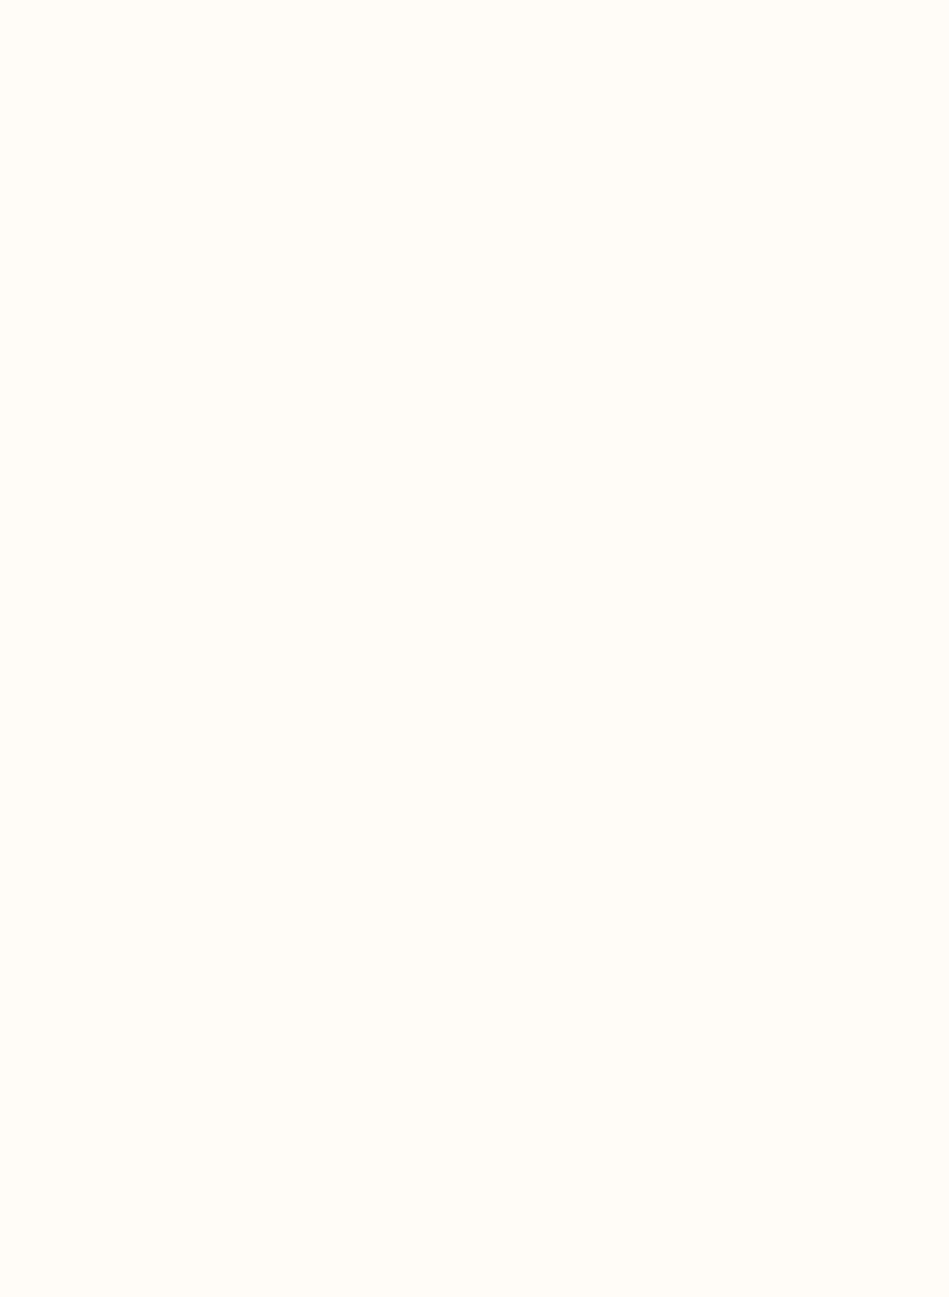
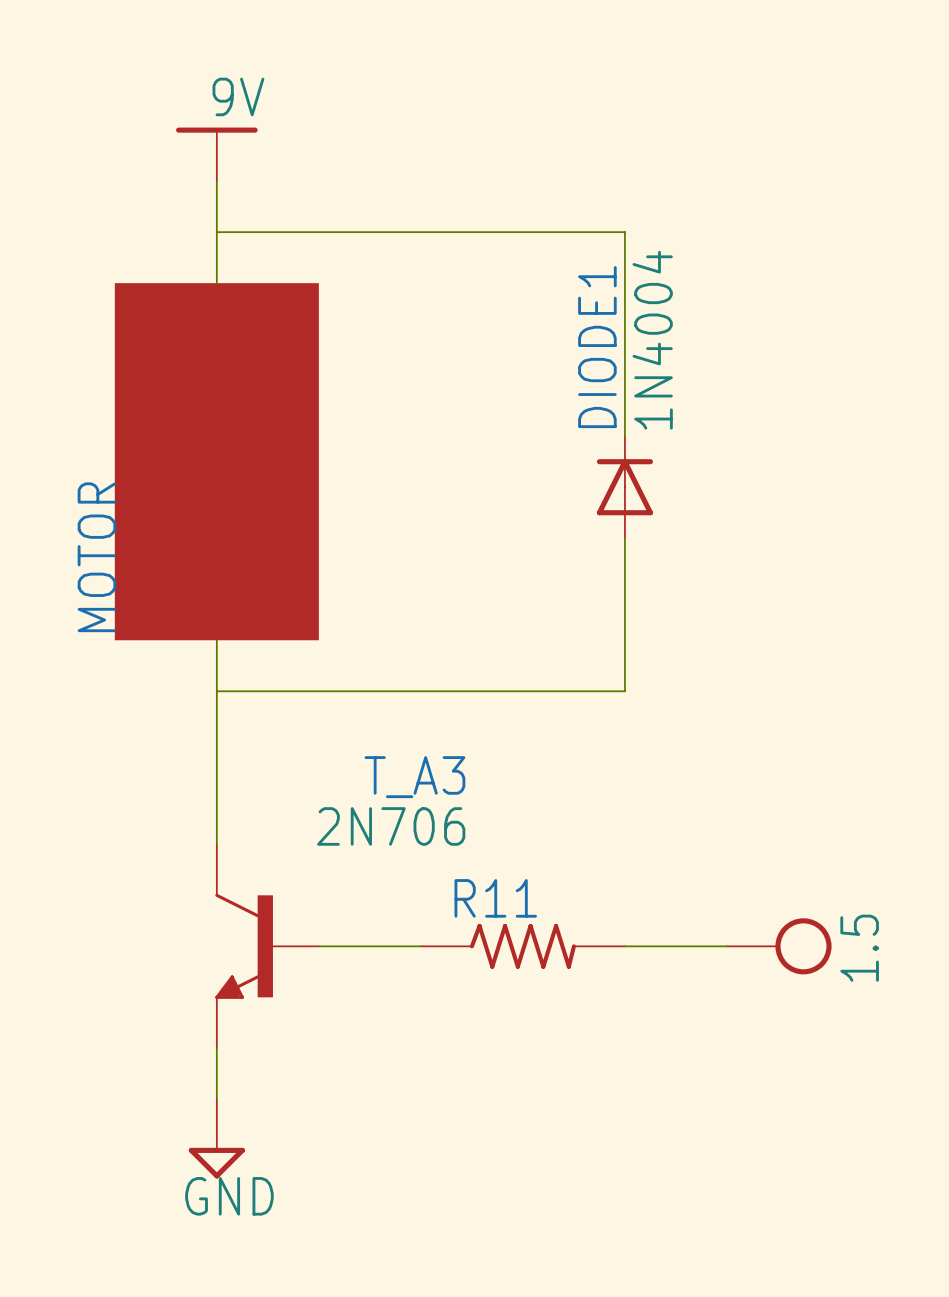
power symbol: none -> 9V (216, 154)
wire: none -> (216, 181) (216, 283)
wire: none -> (216, 232) (624, 232) (624, 436)
drawing: none -> [114, 283, 319, 641]
DIODE1: none -> 1N4004 (624, 487)
wire: none -> (624, 538) (624, 691) (216, 691)
text: none -> MOTOR (96, 557)
wire: none -> (216, 640) (216, 844)
T_A3: none -> 2N706 (267, 946)
wire: none -> (318, 946) (420, 946)
R11: none -> (522, 946)
wire: none -> (624, 946) (726, 946)
power symbol: none -> 1.5 (779, 946)
wire: none -> (216, 1048) (216, 1099)
power symbol: none -> GND (216, 1138)

